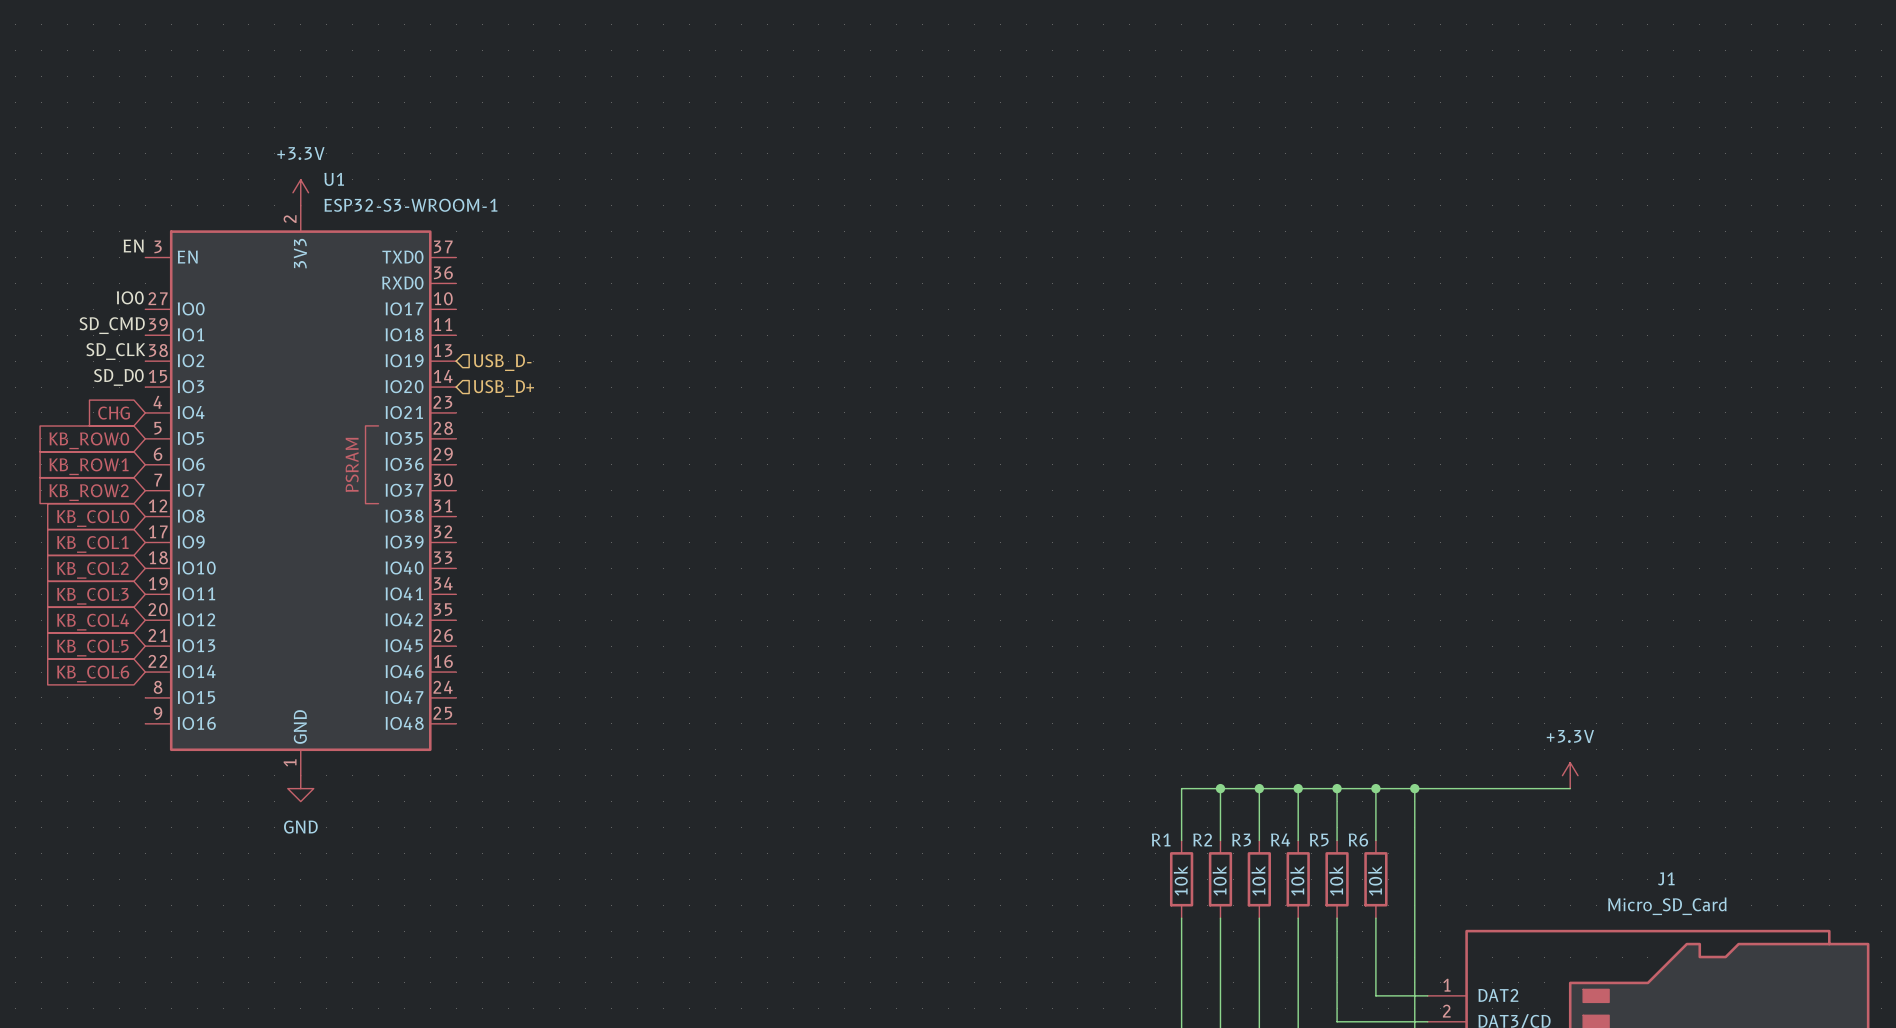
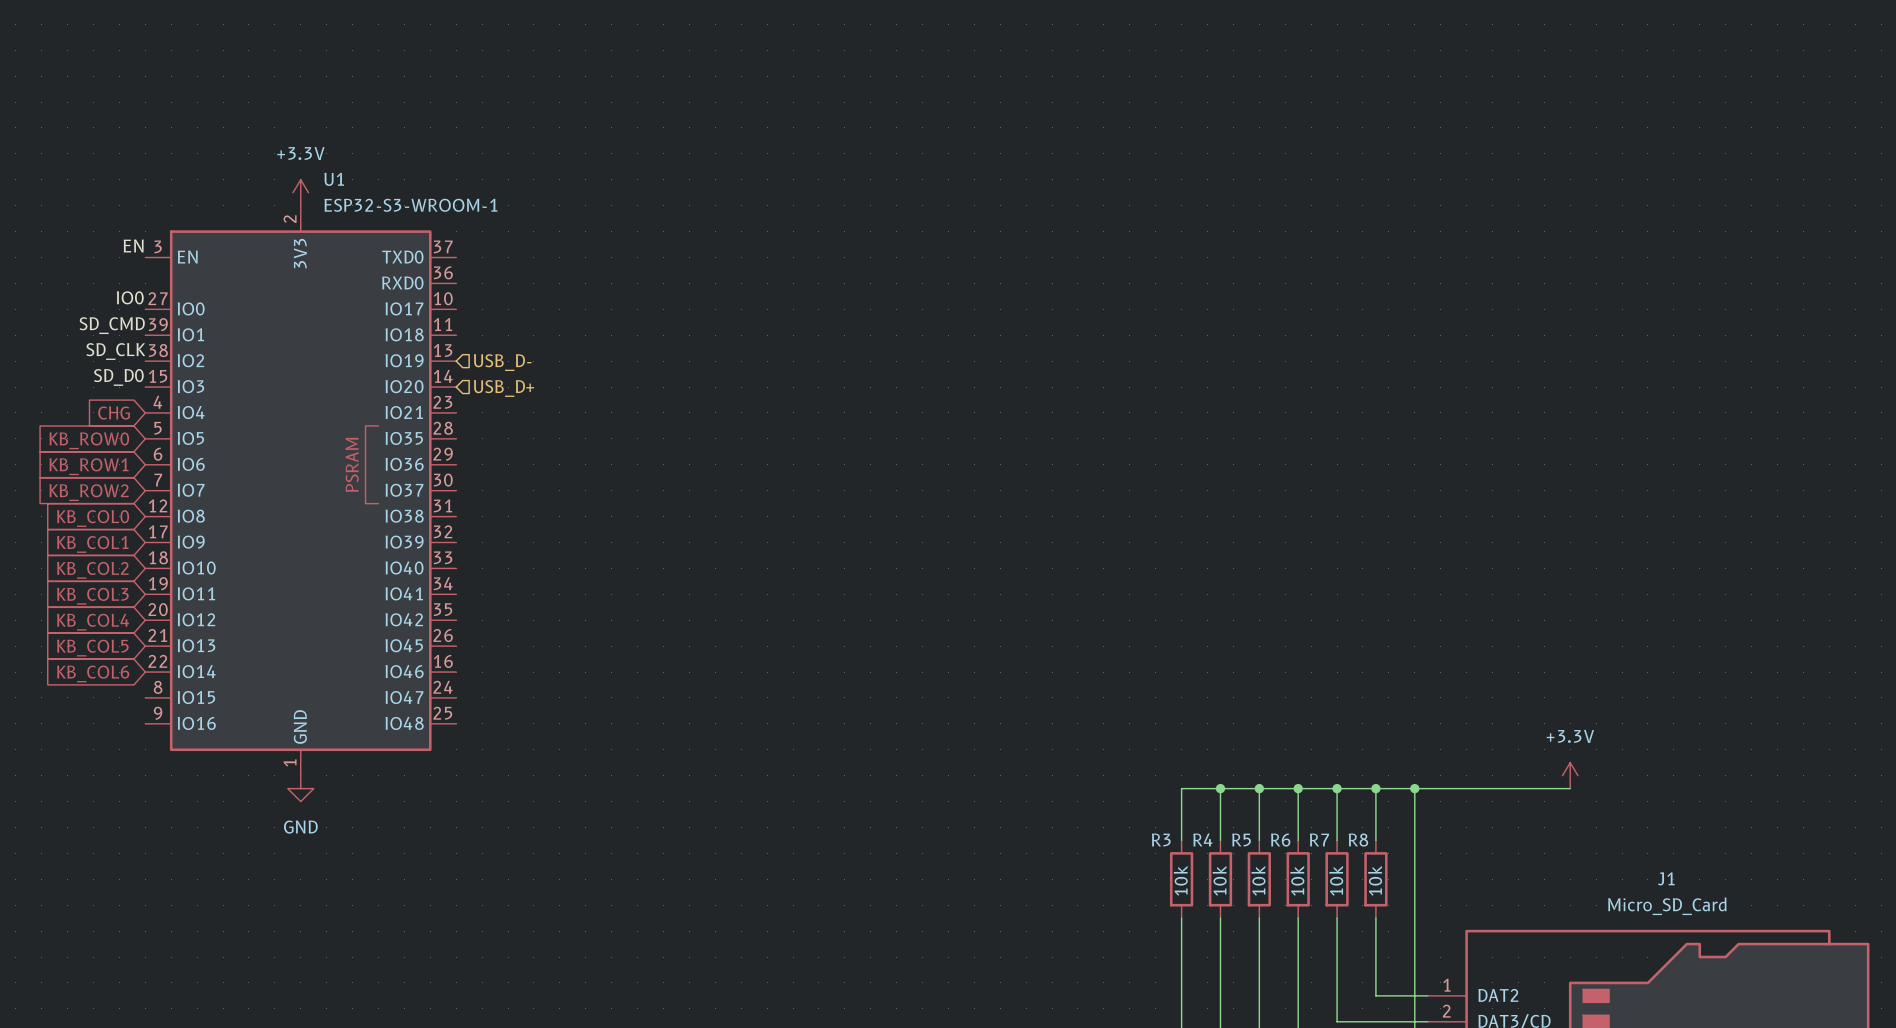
R1 name: R1 (1161, 839) -> R3 (1161, 839)
R2 name: R2 (1202, 839) -> R4 (1202, 839)
R3 name: R3 (1241, 839) -> R5 (1241, 839)
R4 name: R4 (1280, 839) -> R6 (1280, 840)
R5 name: R5 (1319, 839) -> R7 (1319, 839)
R6 name: R6 (1358, 840) -> R8 (1358, 840)

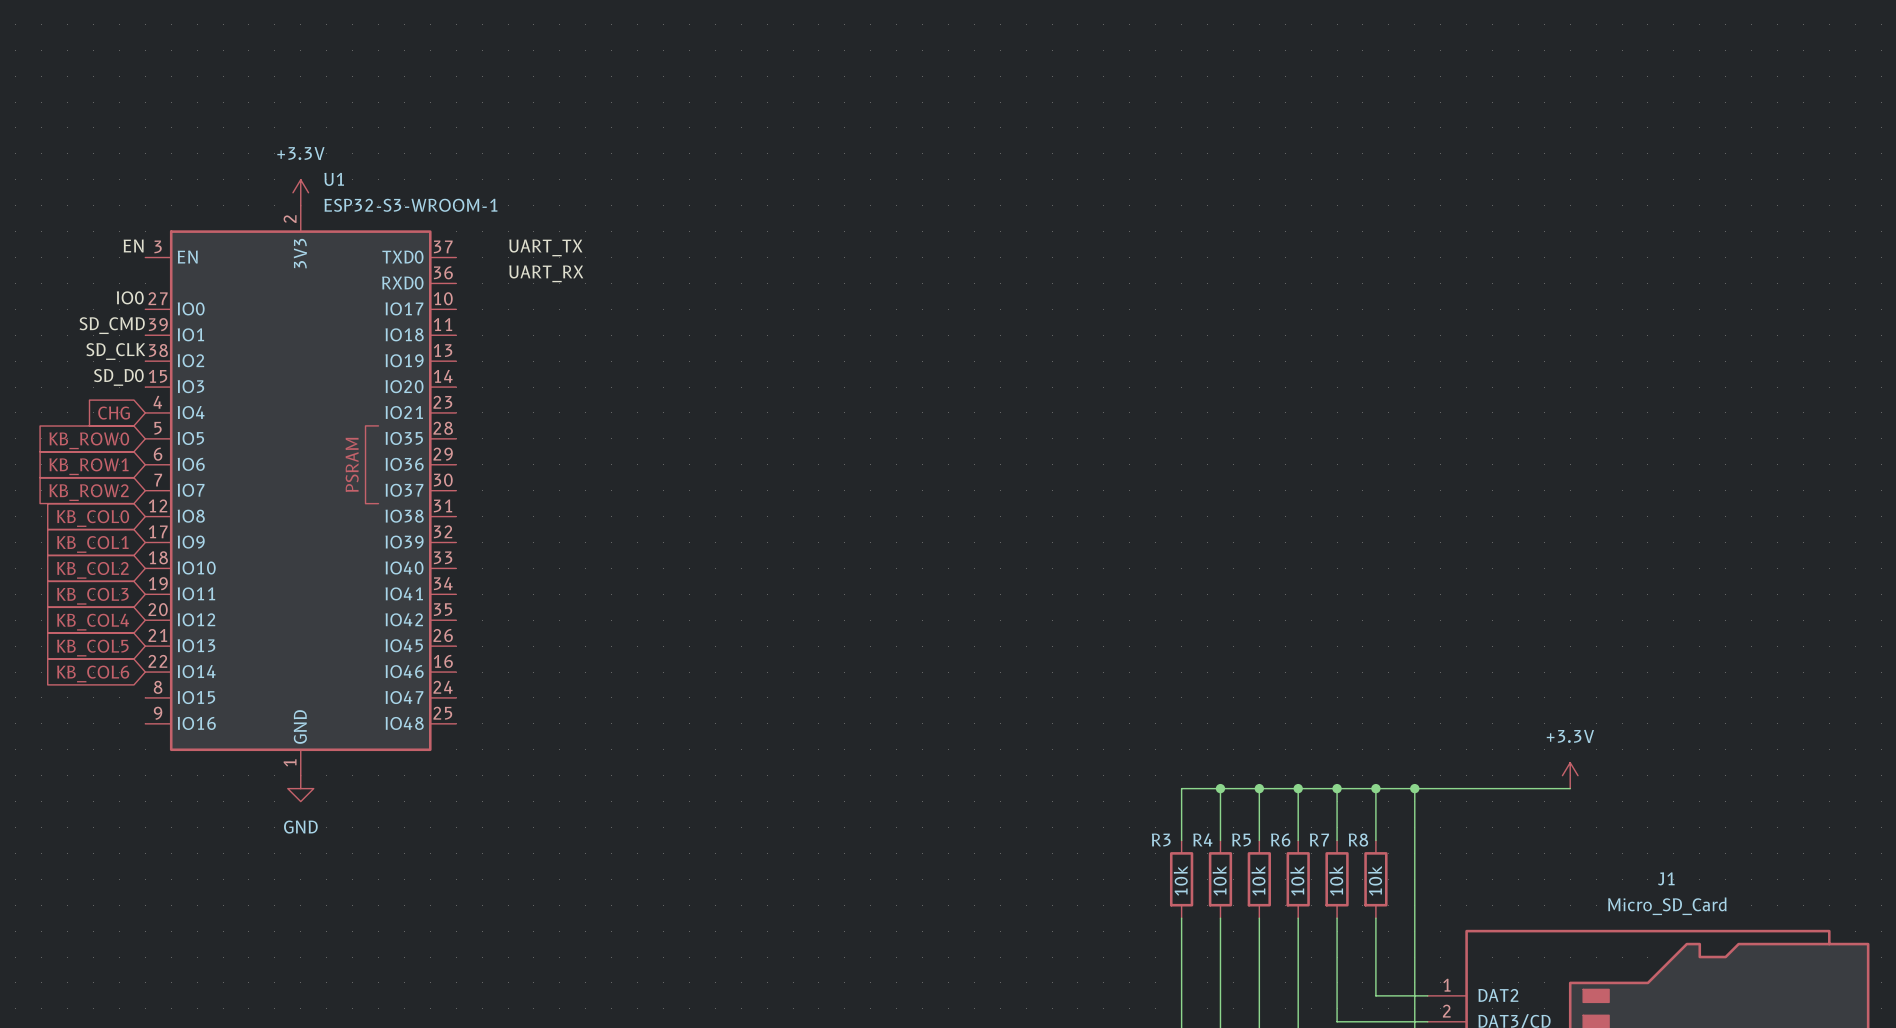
label: none -> UART_TX (545, 247)
label: none -> UART_RX (546, 273)
hierarchical label: USB_D- (502, 362) -> none
hierarchical label: USB_D+ (503, 388) -> none

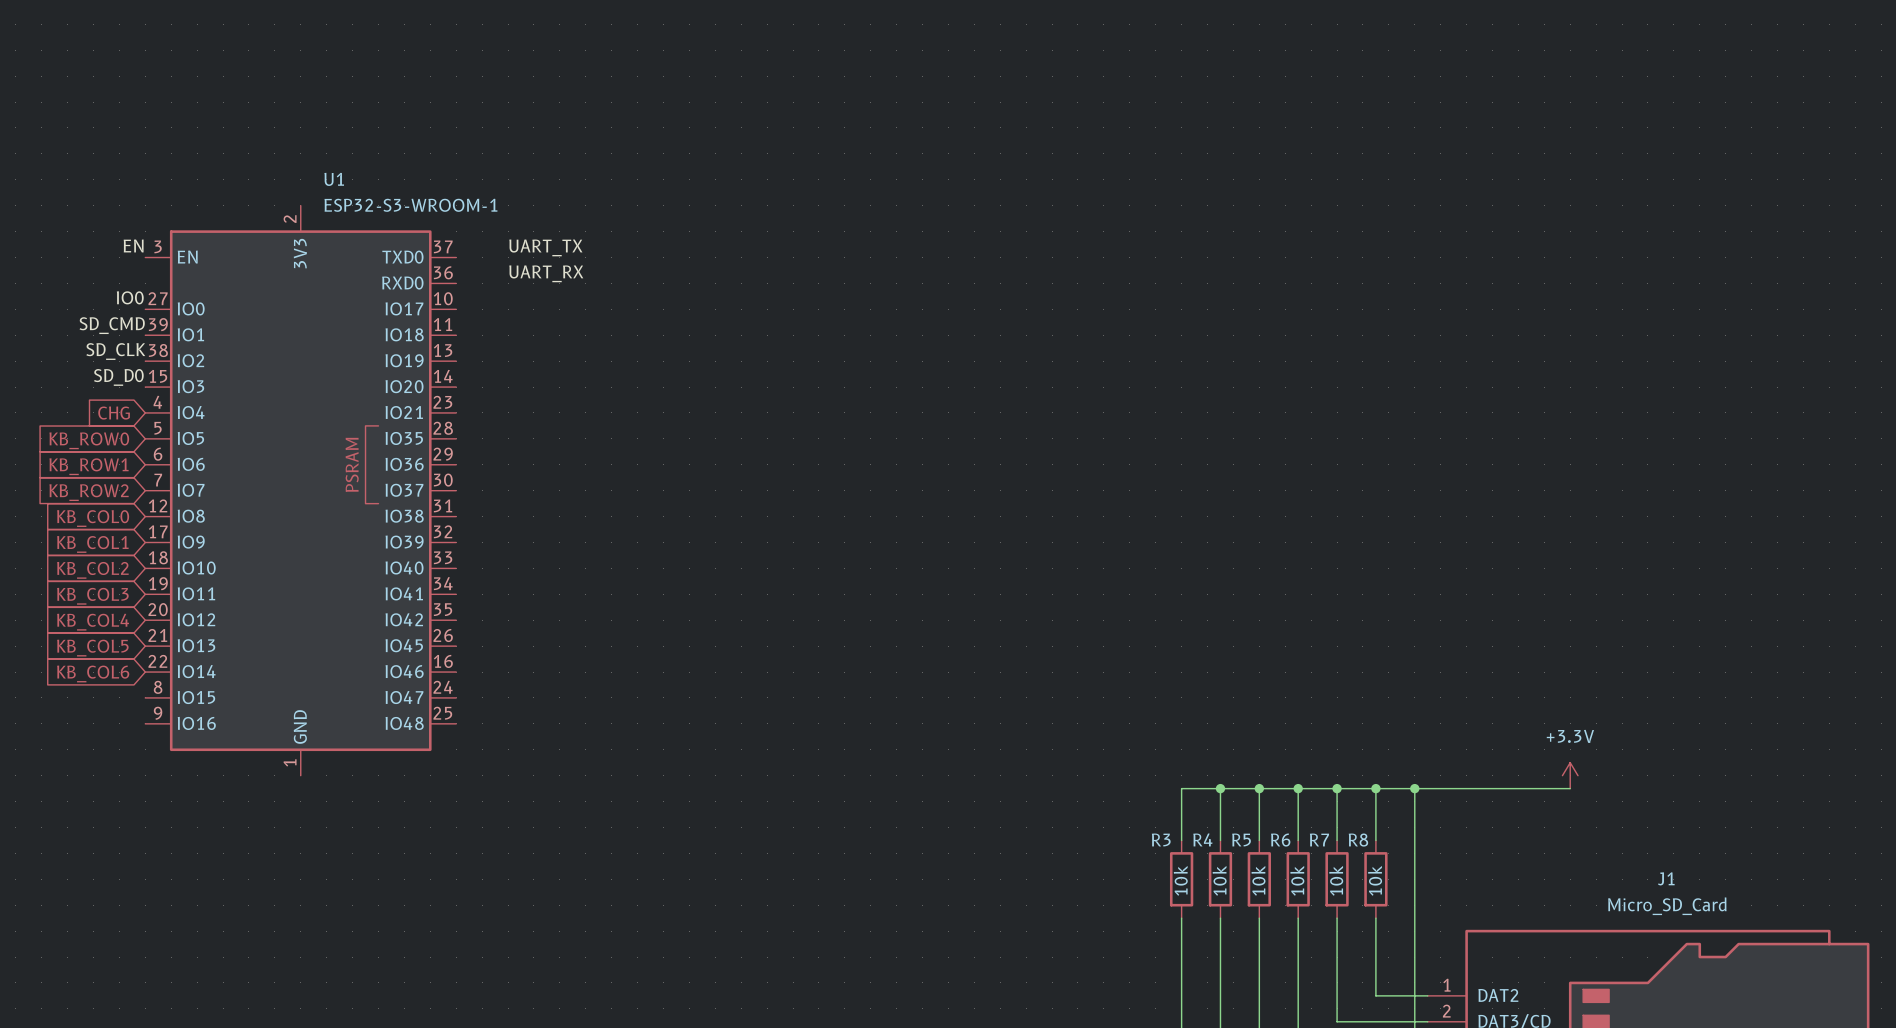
power symbol: +3.3V (300, 192) -> none
power symbol: GND (300, 788) -> none

